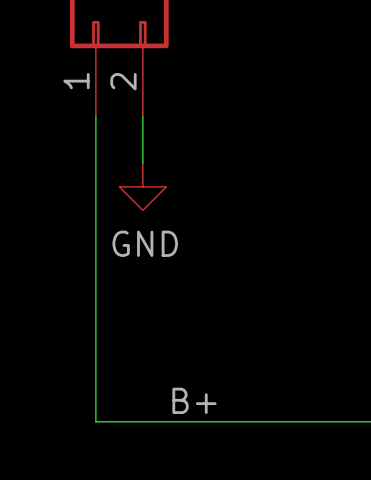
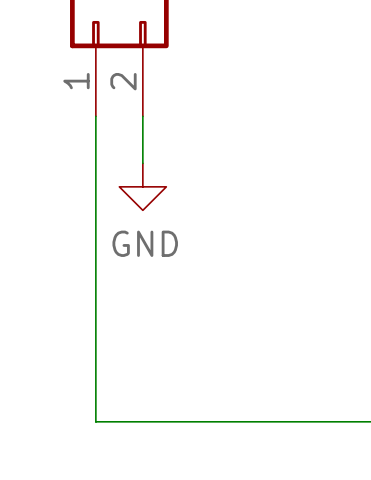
label: B+ (194, 400) -> none

